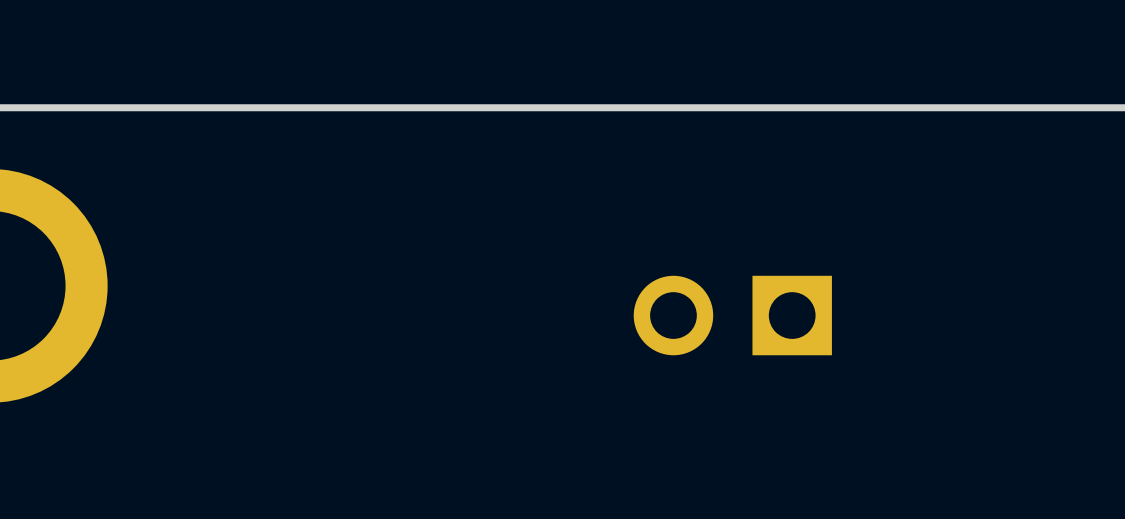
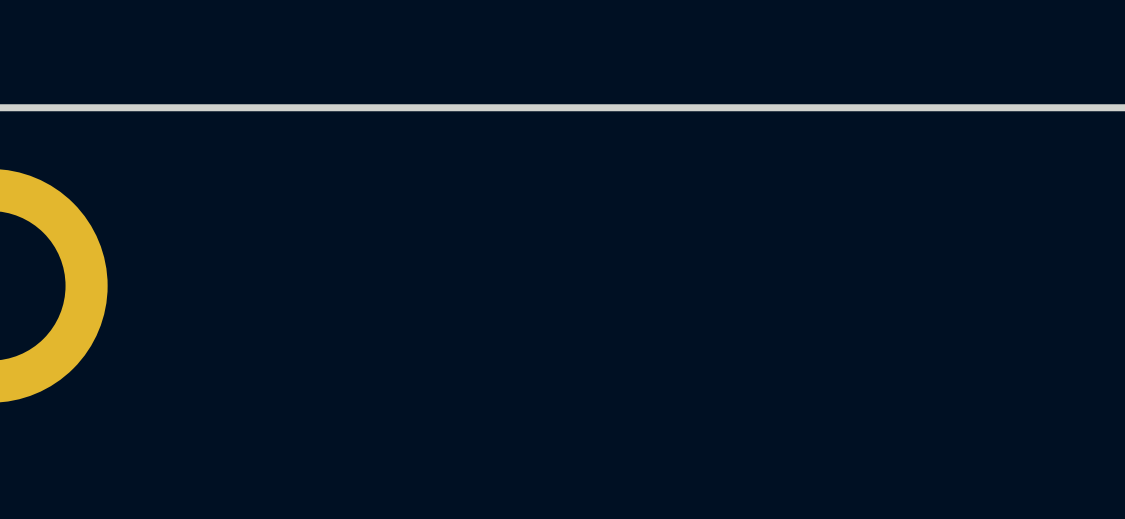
part: (732, 315) -> none

